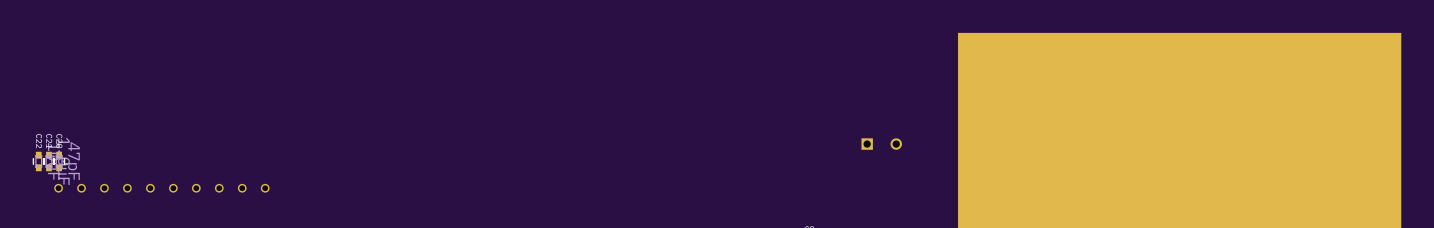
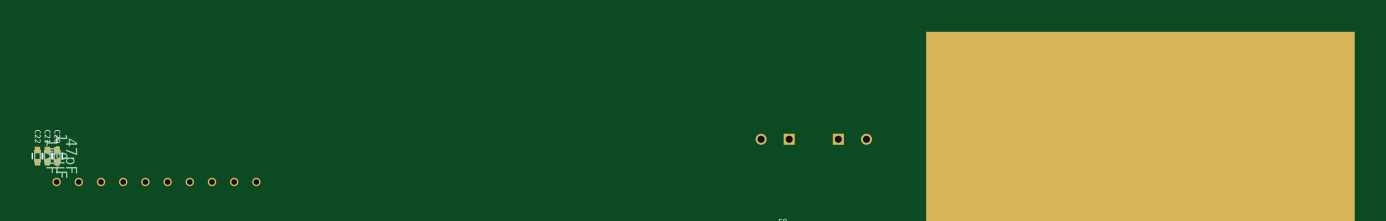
part: none -> (775, 139)

